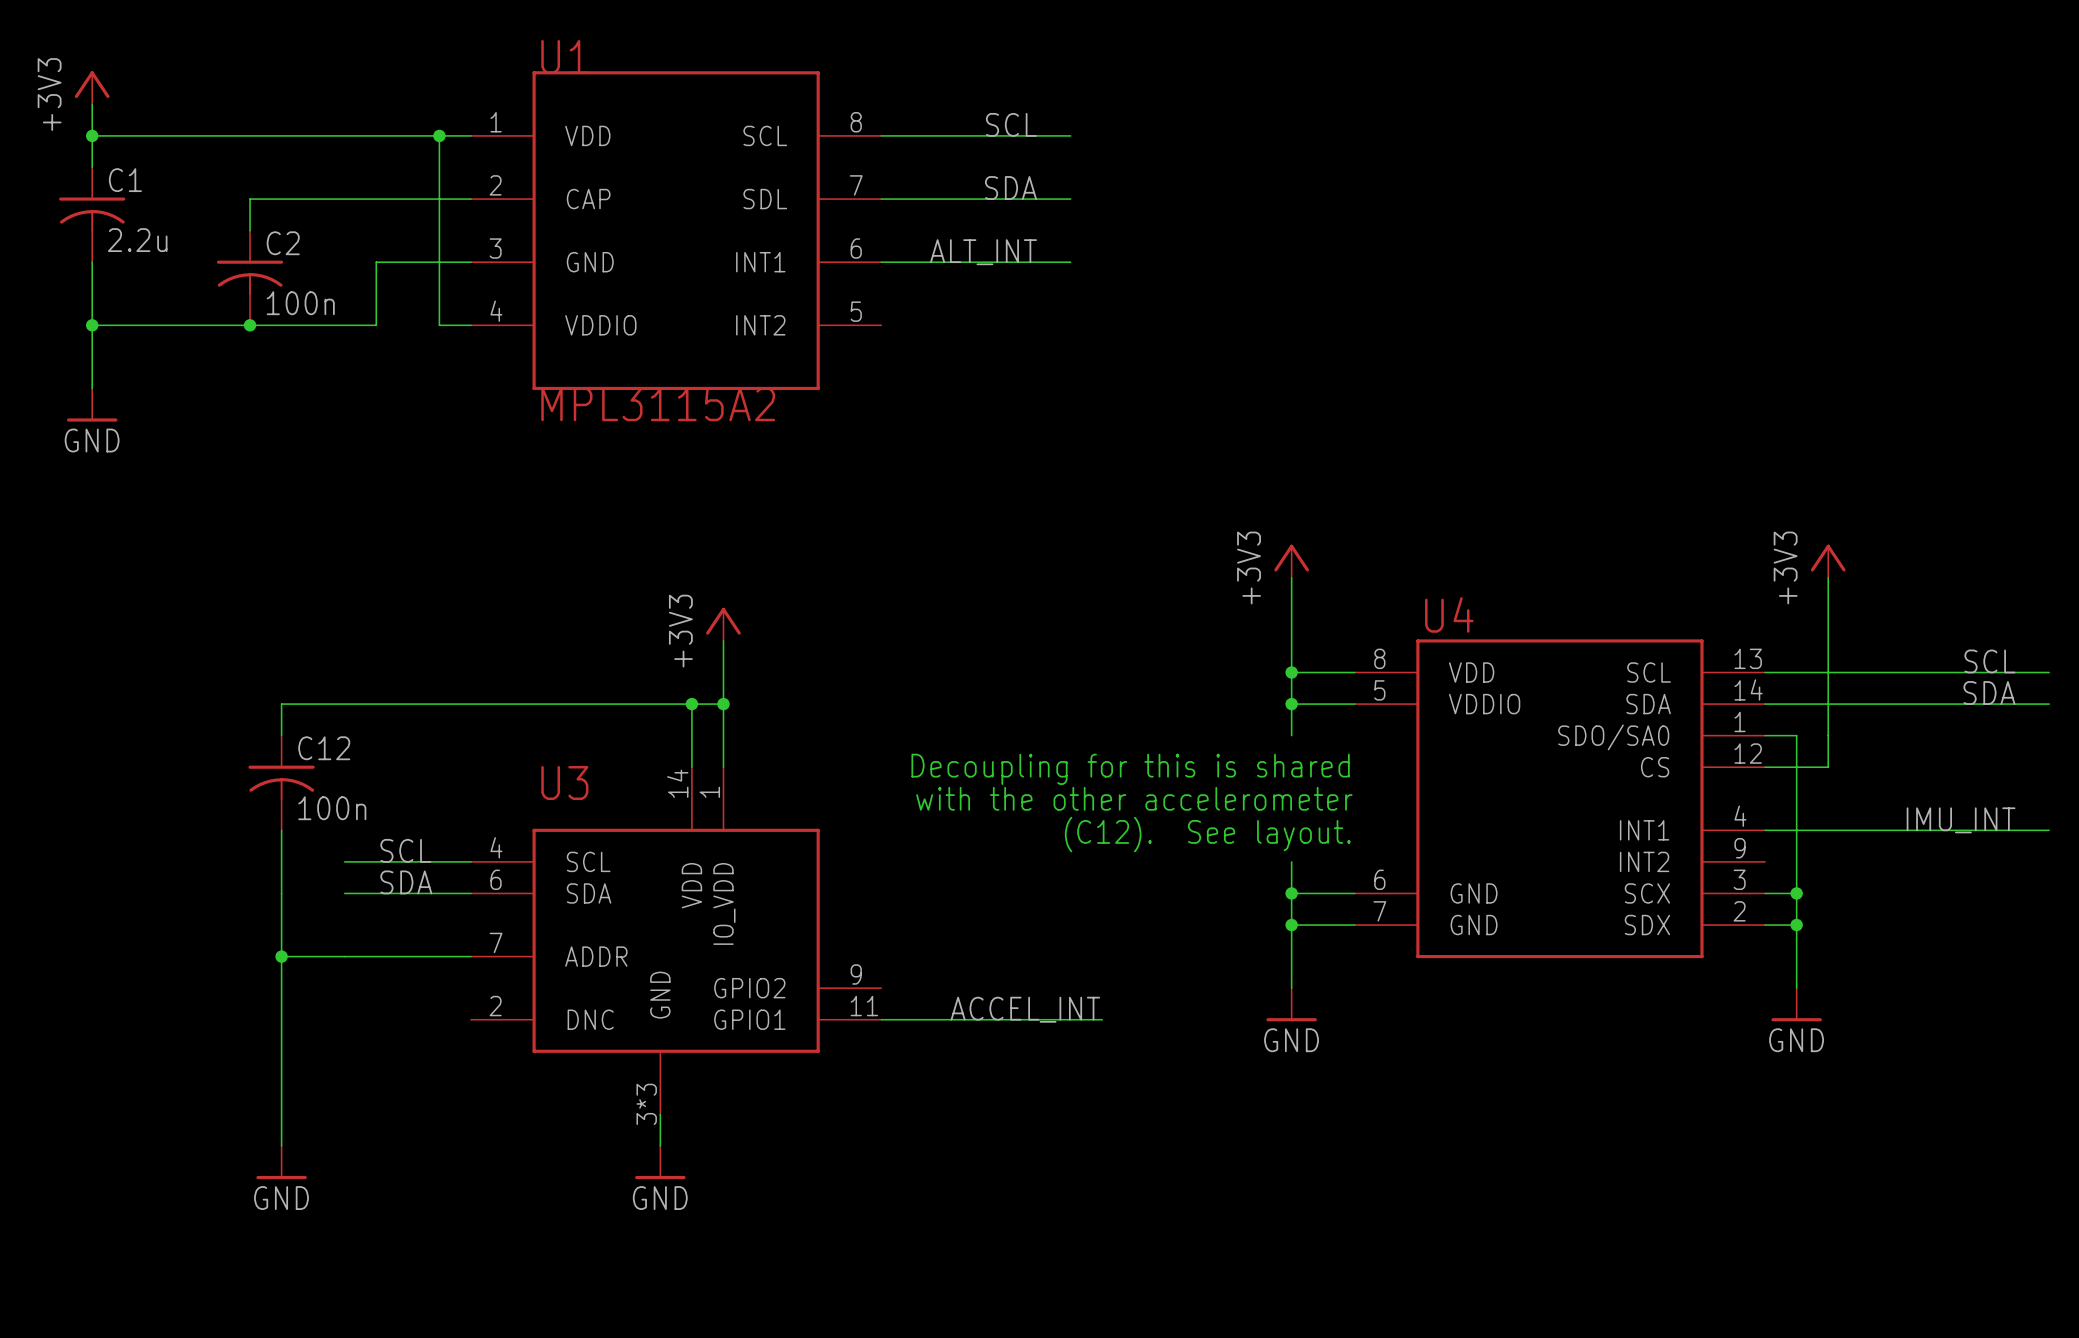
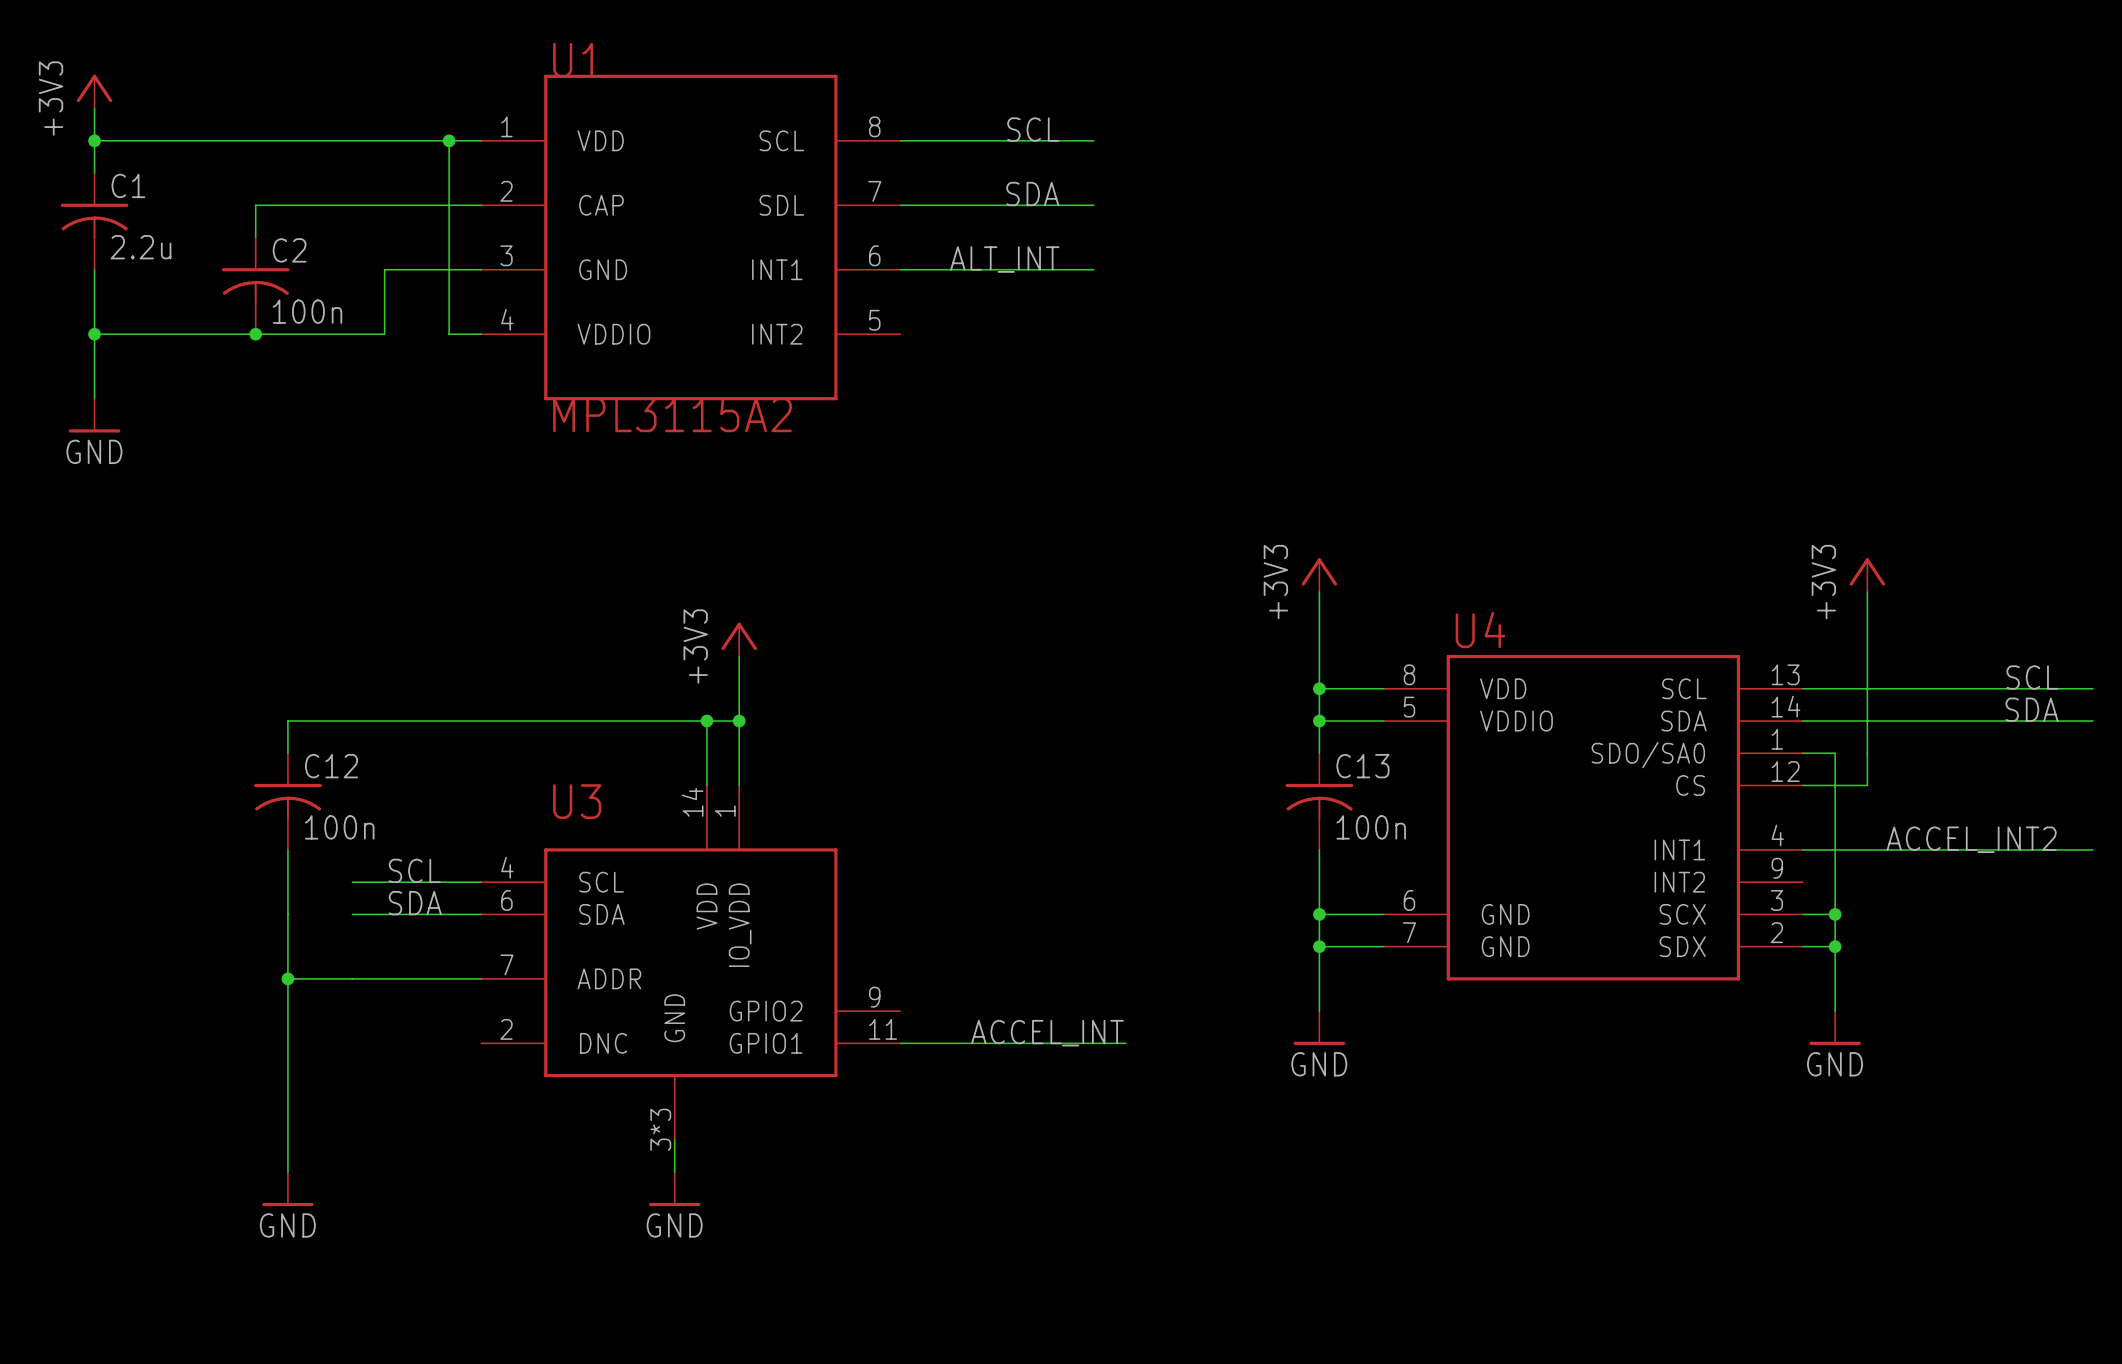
text: Decoupling for this is shared (1130, 769) -> none
C13: none -> 100n (1319, 801)
text: with the other accelerometer (1134, 798) -> none
label: IMU_INT (1961, 820) -> ACCEL_INT2 (1971, 839)
wire: none -> (1319, 849) (1319, 882)
text: (C12). See layout. (1207, 834) -> none

